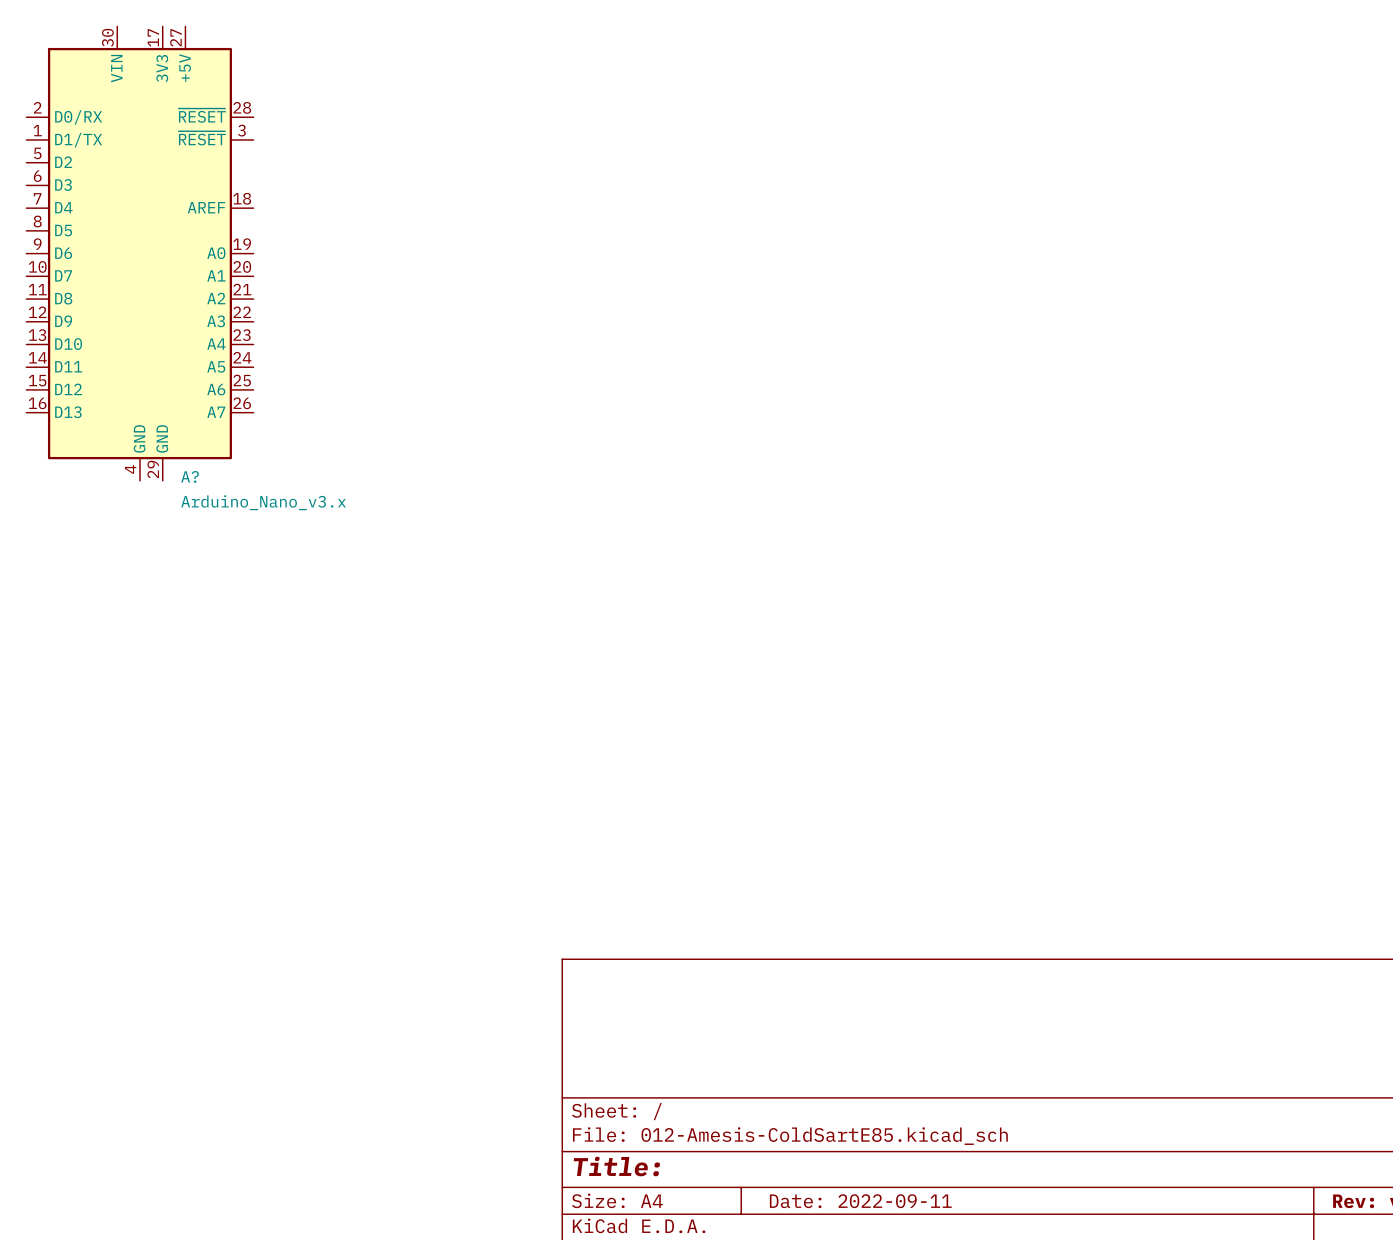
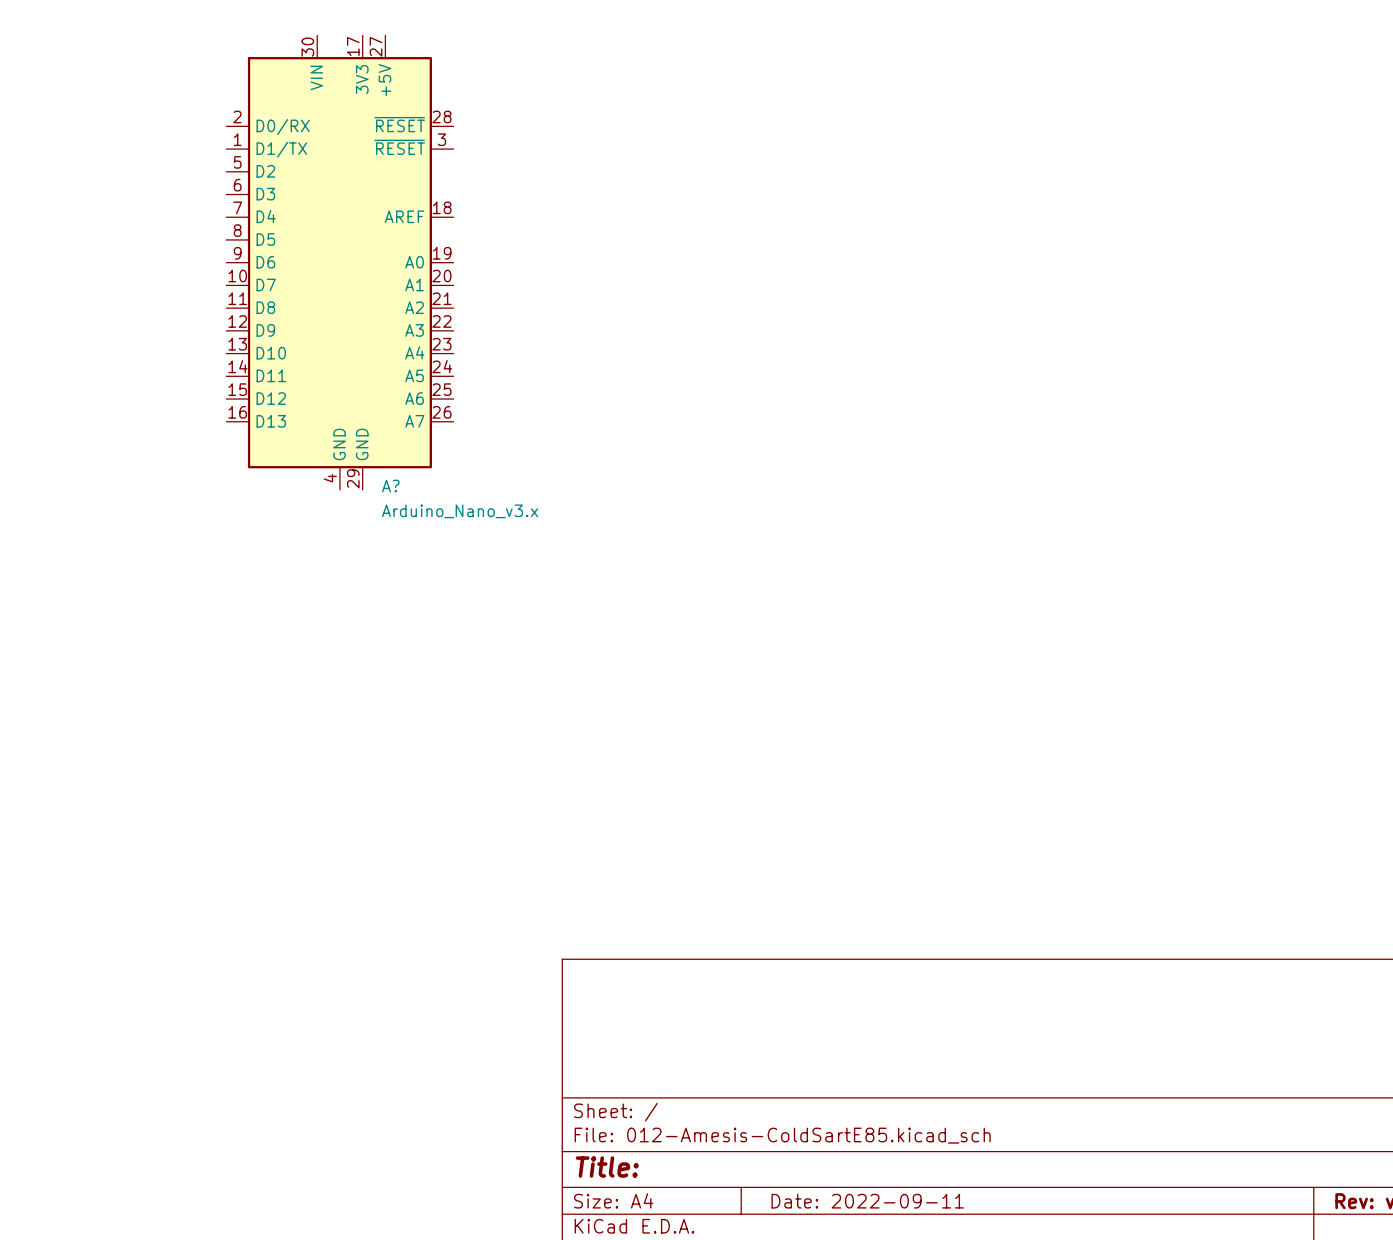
A? position: (139, 253) -> (339, 262)

